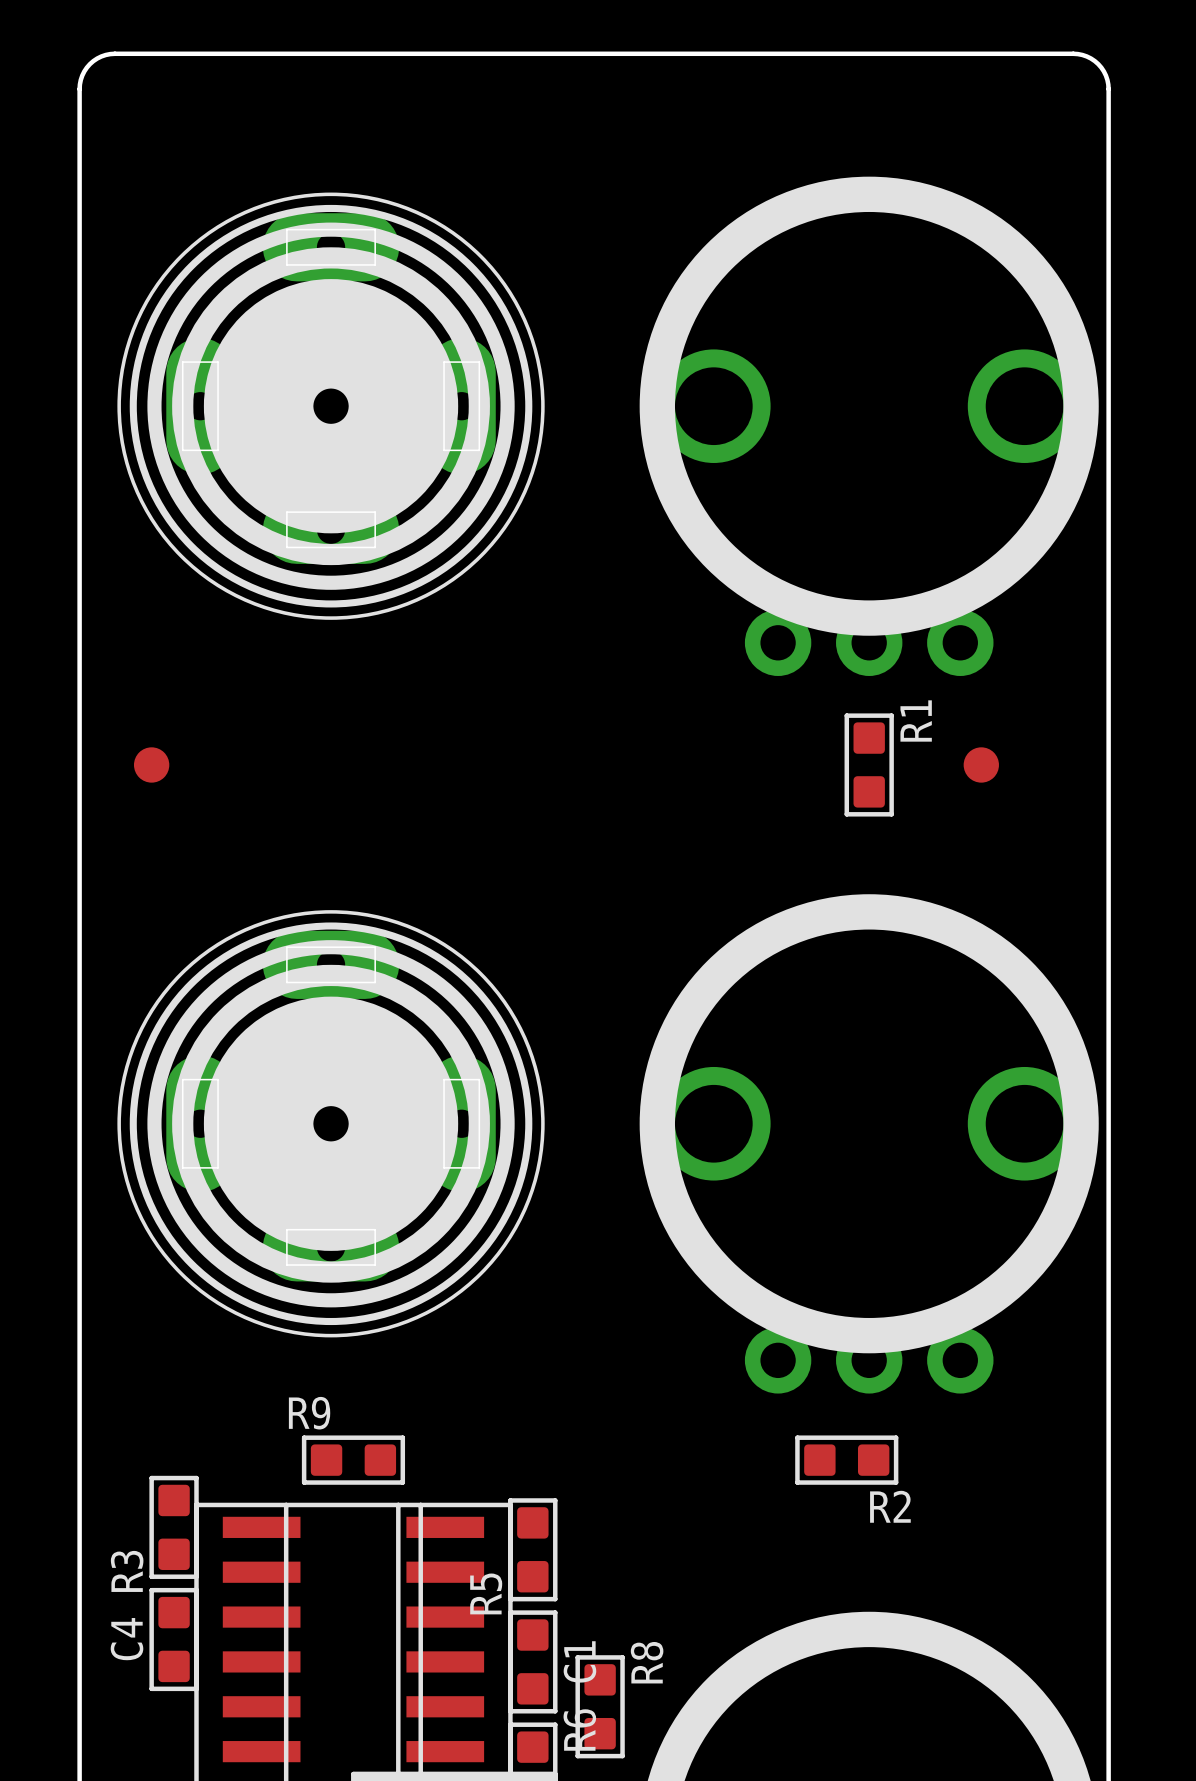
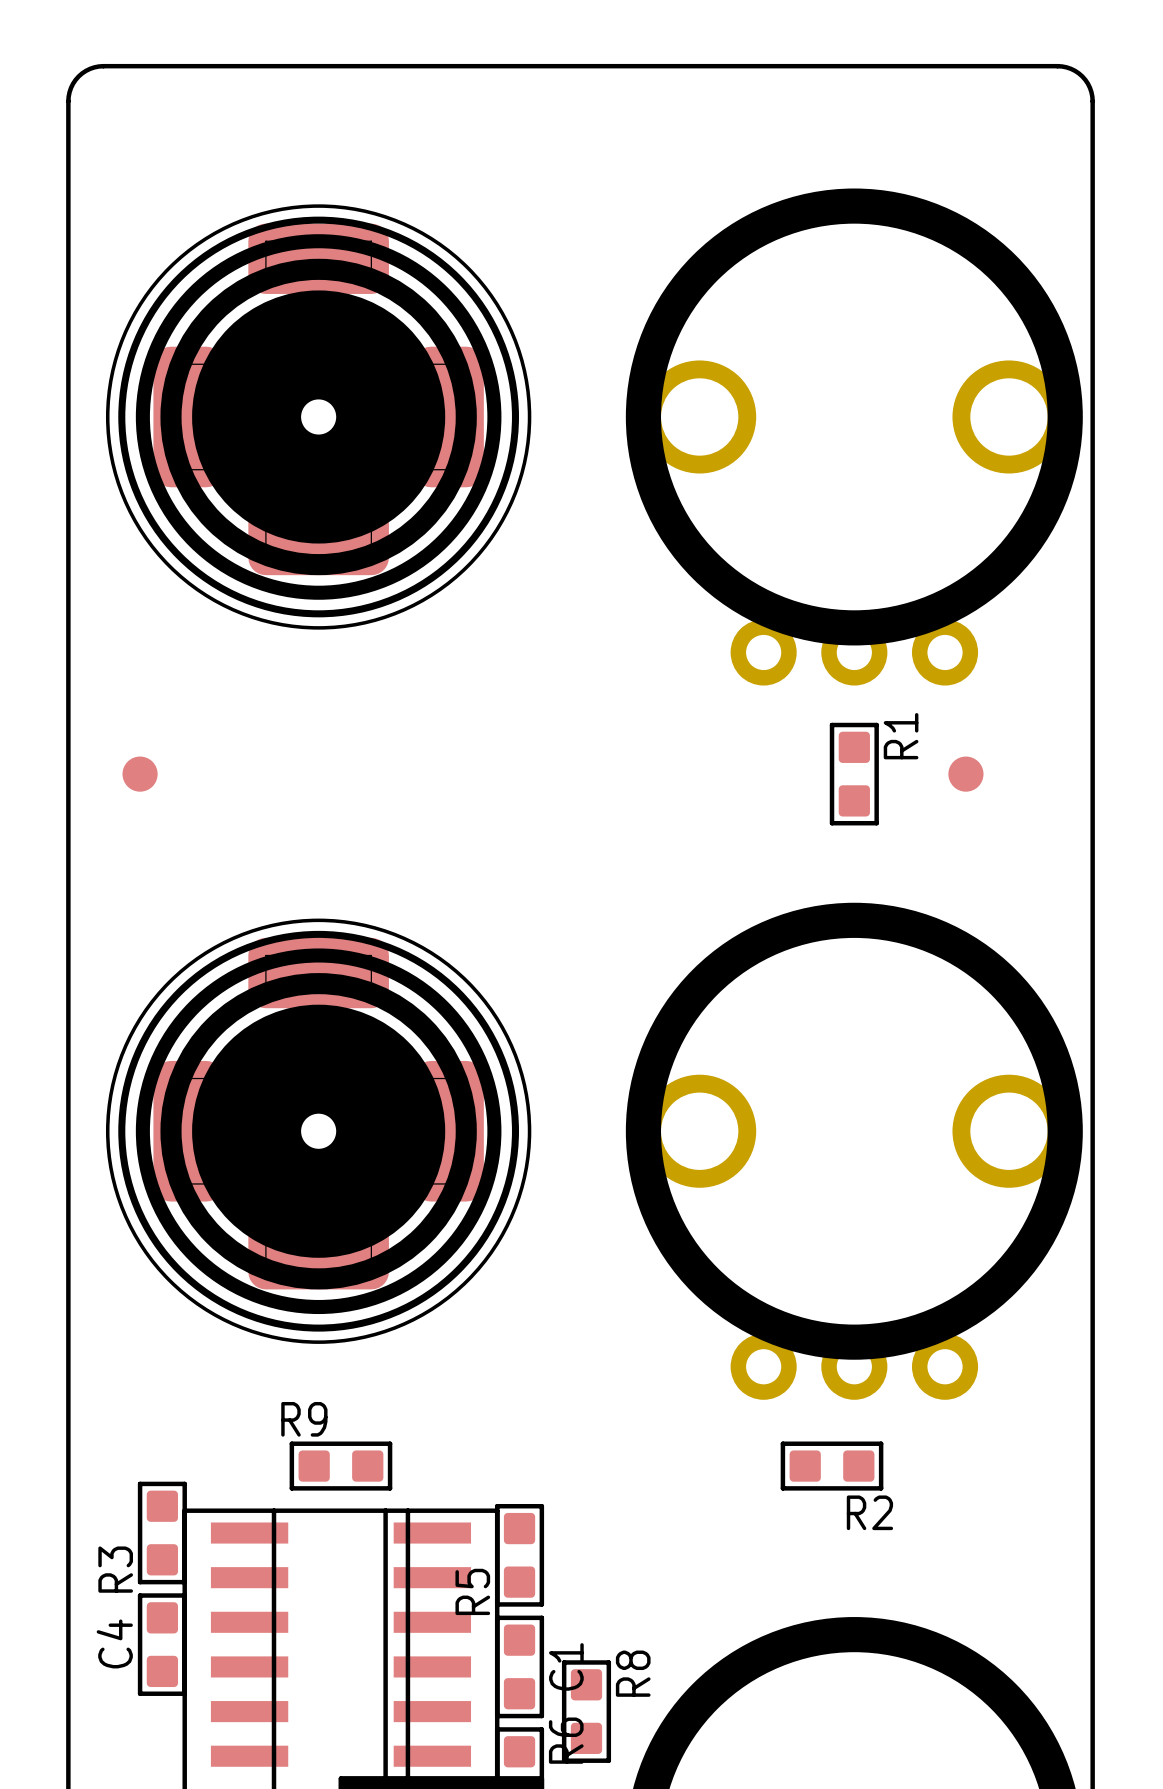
part footprint: [117, 192, 545, 620] -> [105, 204, 532, 630]
part footprint: [117, 910, 545, 1338] -> [105, 918, 532, 1344]

